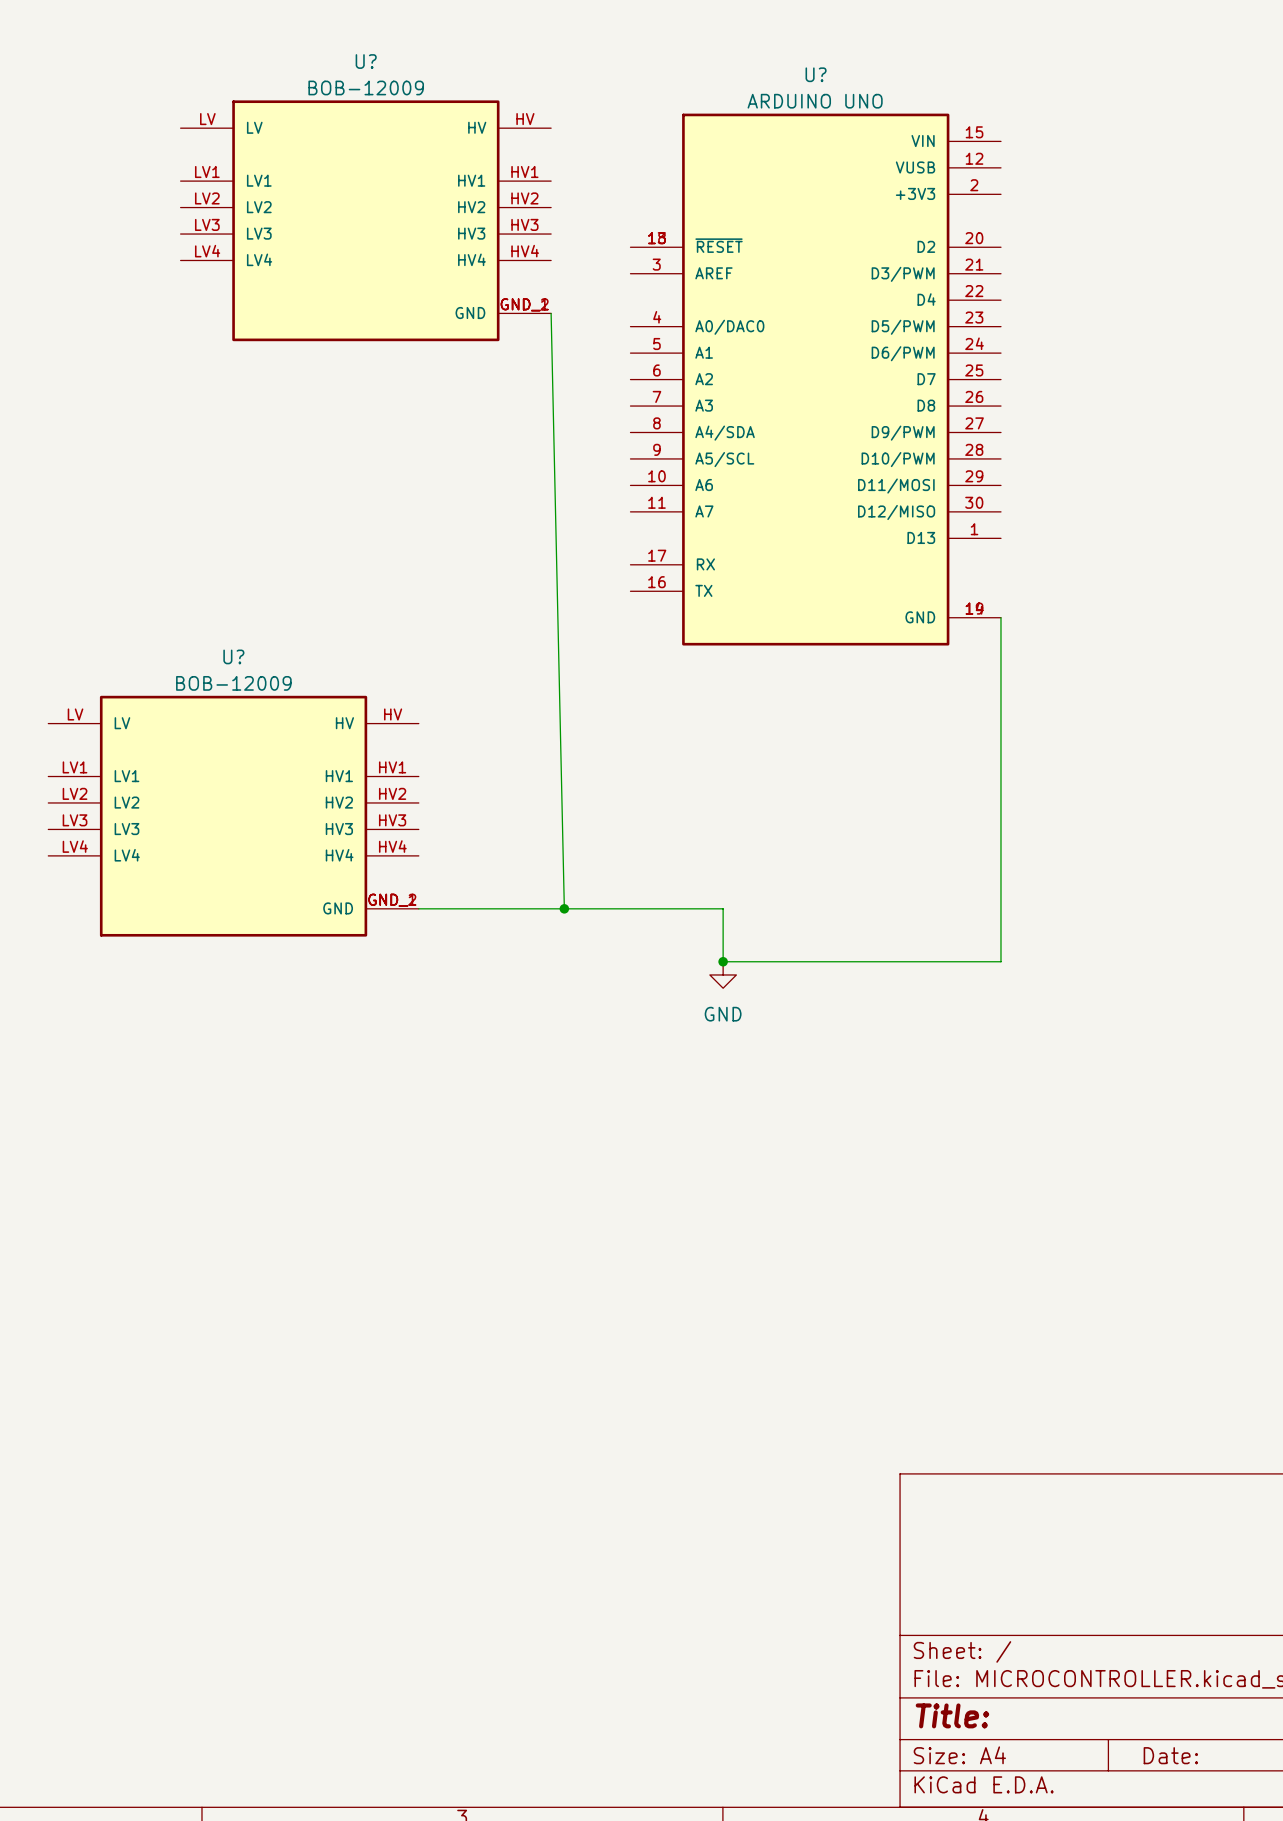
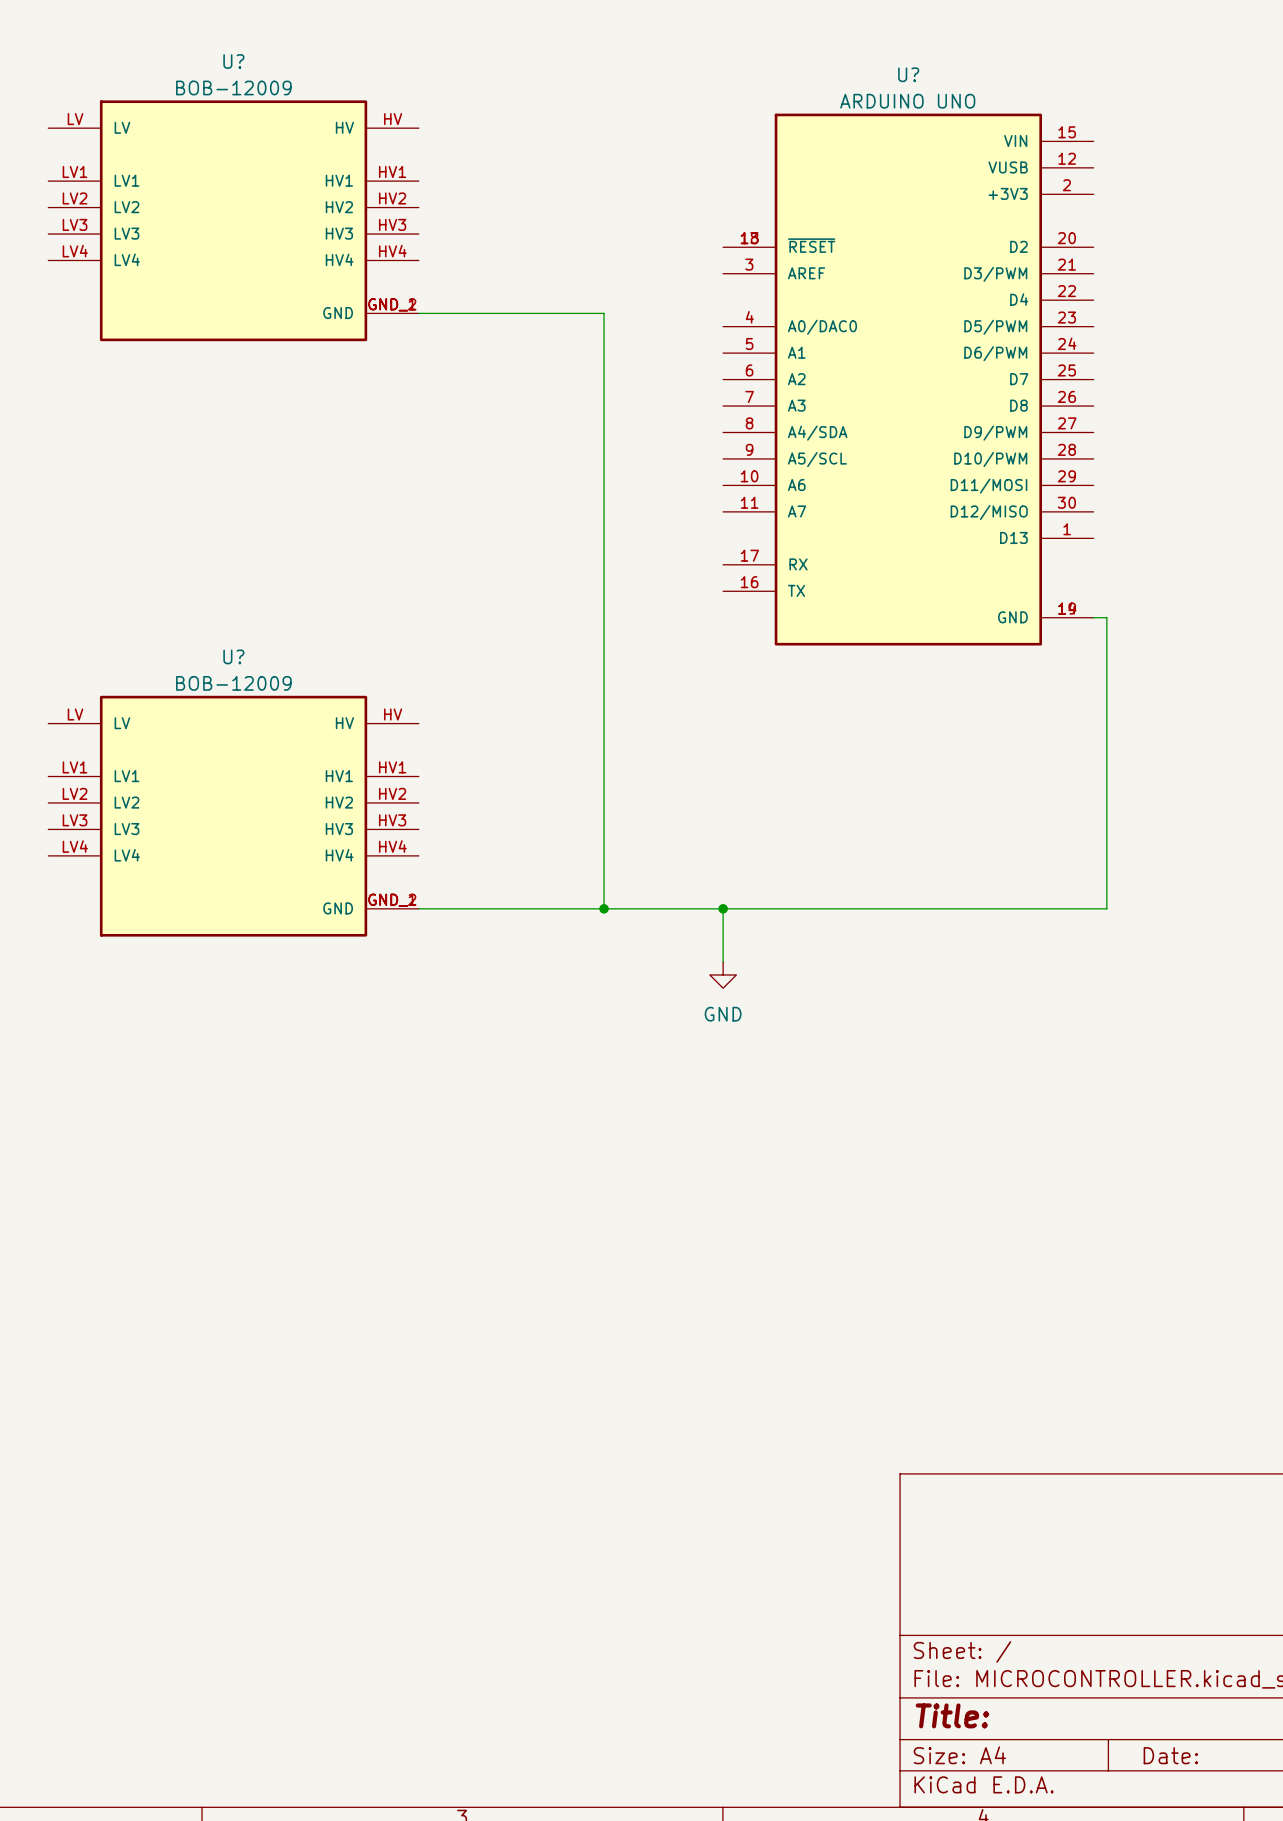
U? position: (365, 220) -> (233, 220)
wire: none -> (418, 313) (604, 313) (604, 908)
wire: (551, 313) (564, 908) -> none
U? position: (815, 379) -> (908, 379)
wire: (1000, 617) (1000, 961) (723, 961) -> none
wire: none -> (1093, 617) (1106, 617) (1106, 908) (723, 908)
junction position: (564, 908) -> (604, 908)
junction position: (723, 961) -> (723, 908)

